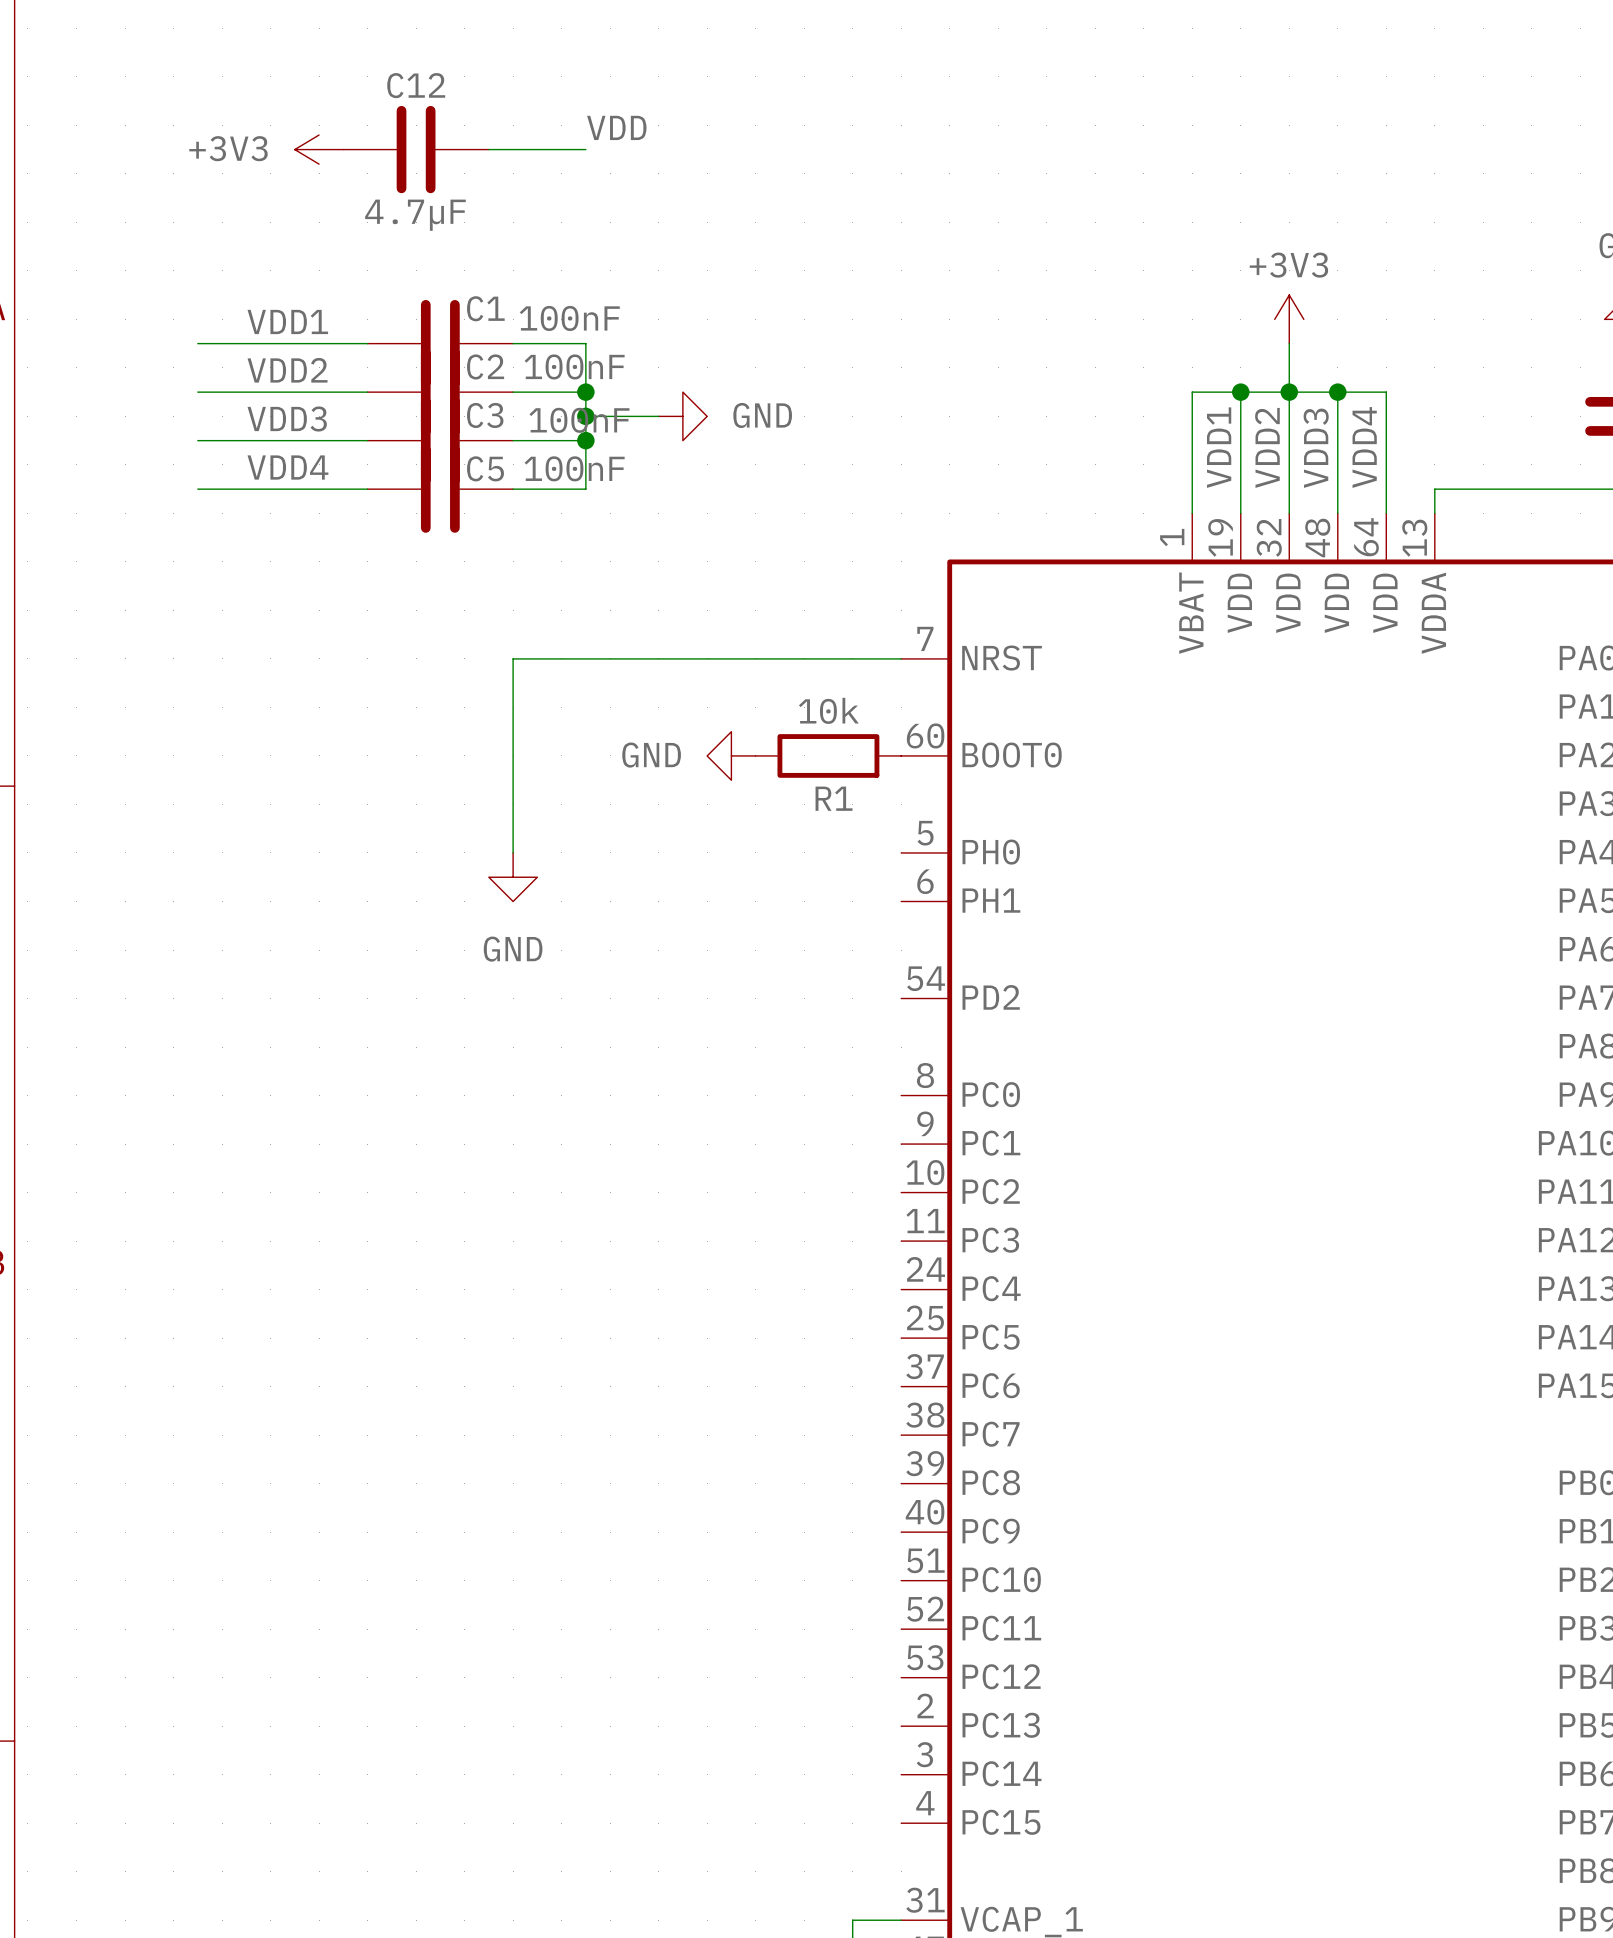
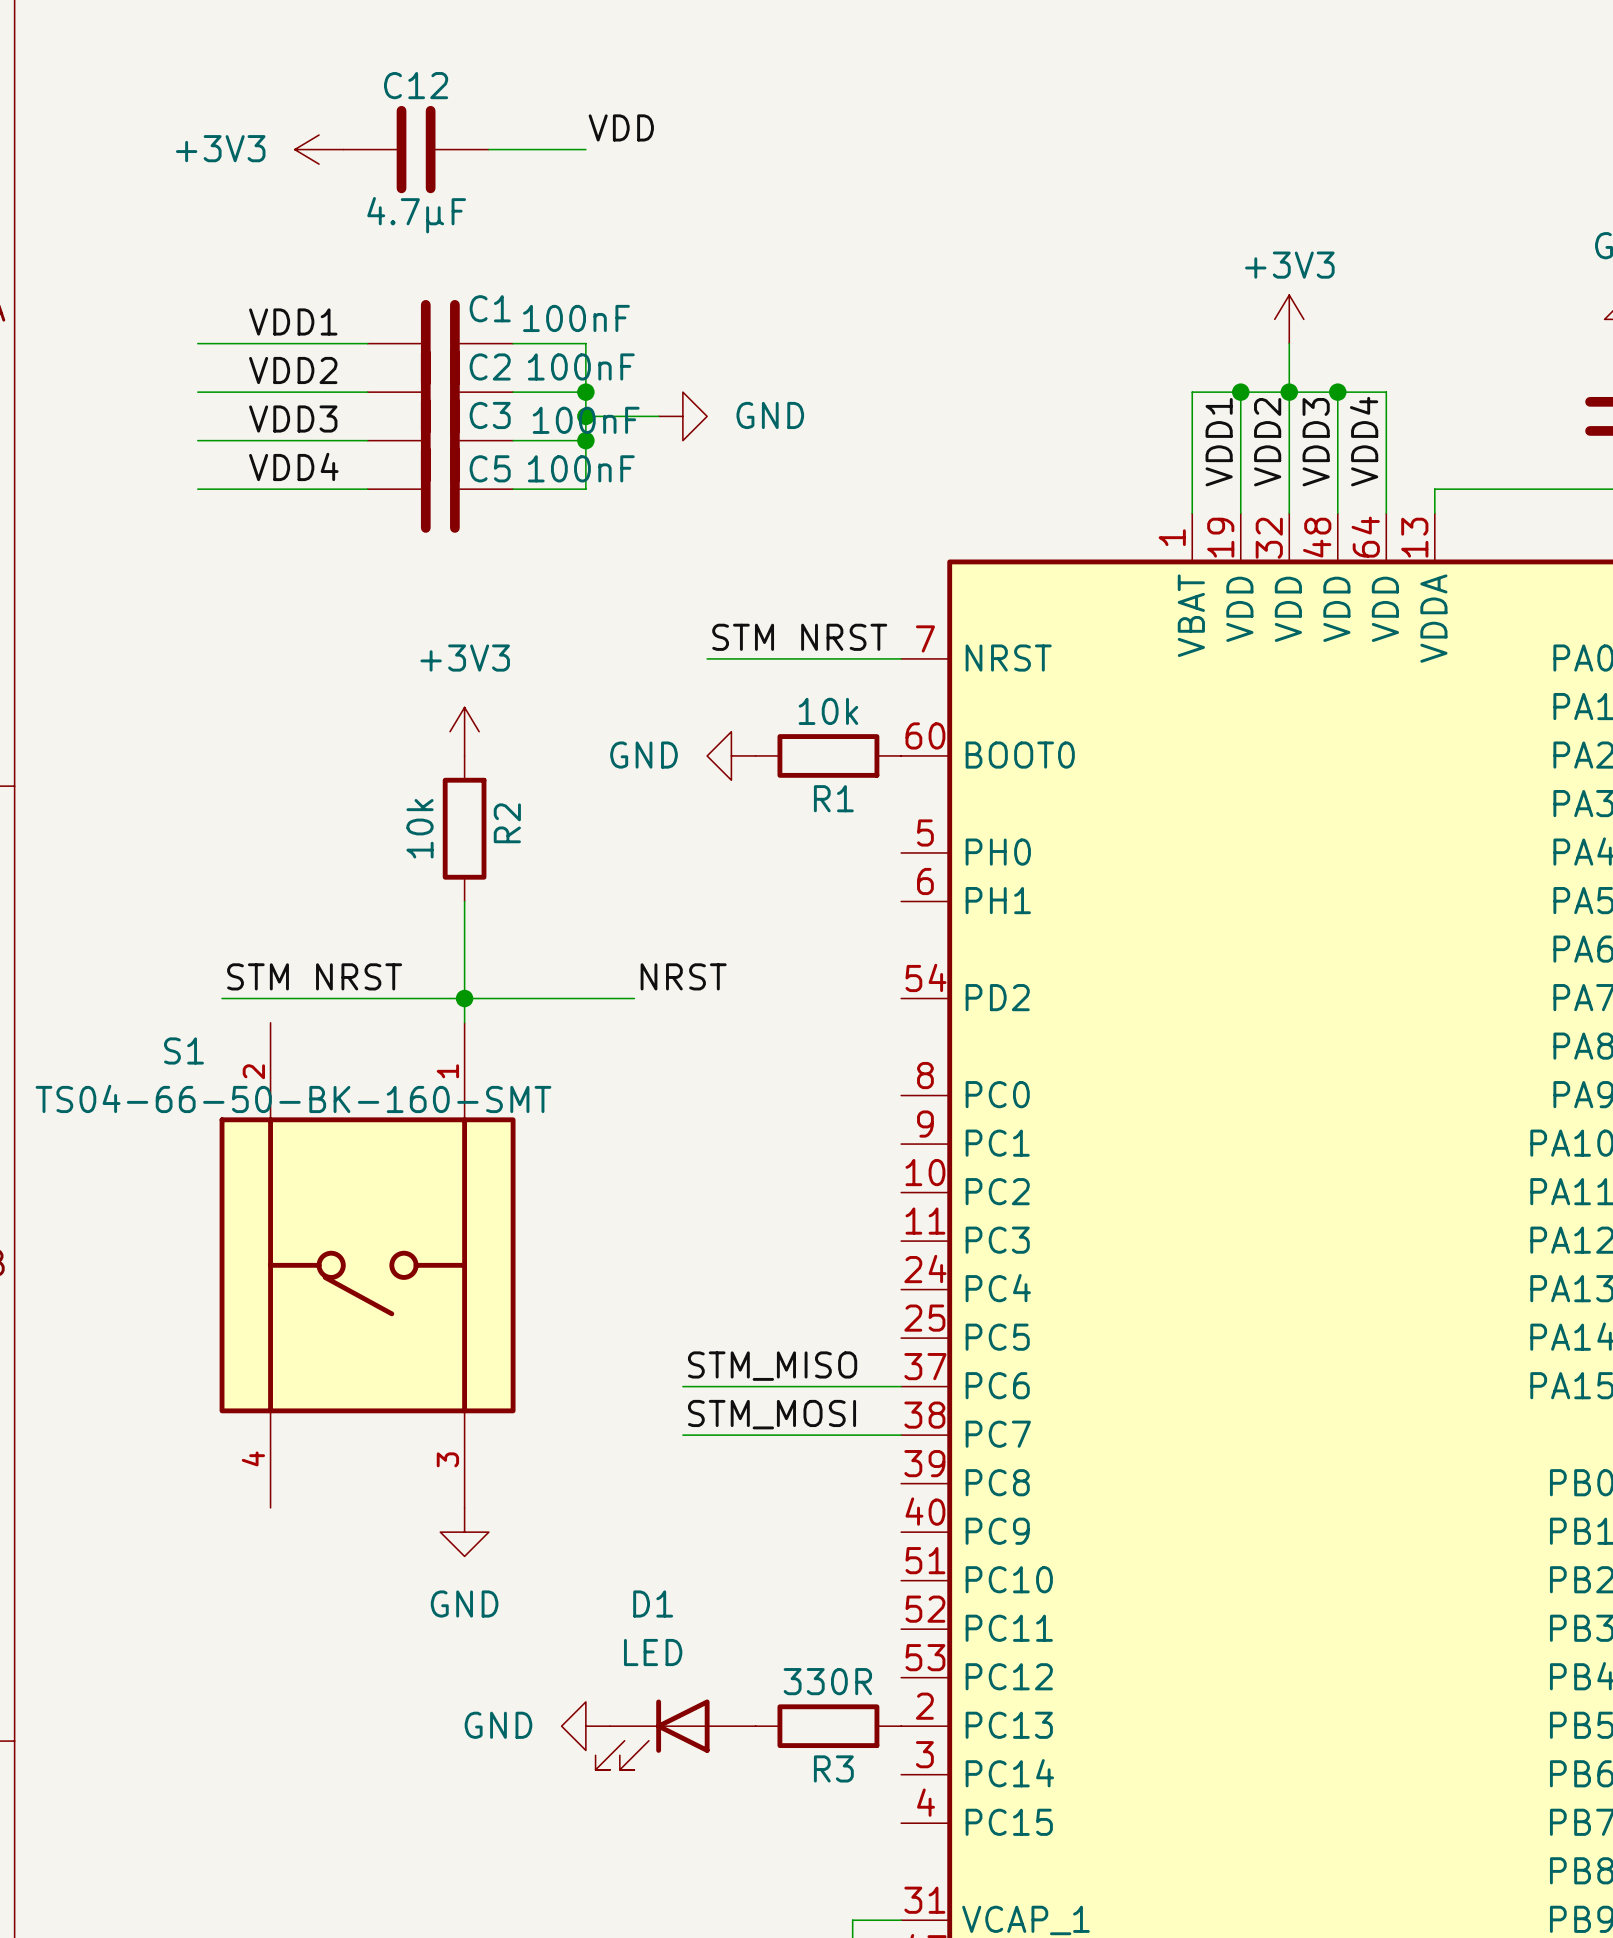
label: none -> STM NRST (799, 637)
wire: (707, 658) (513, 658) (513, 852) -> none
power symbol: none -> +3V3 (464, 731)
R2: none -> 10k (464, 828)
power symbol: GND (513, 877) -> none
wire: none -> (464, 901) (464, 1022)
label: none -> STM NRST (314, 976)
label: none -> NRST (683, 976)
wire: none -> (222, 998) (634, 998)
junction: none -> (464, 998)
S1: none -> TS04-66-50-BK-160-SMT (367, 1265)
label: none -> STM_MISO (772, 1366)
wire: none -> (682, 1386) (901, 1386)
label: none -> STM_MOSI (772, 1414)
wire: none -> (682, 1435) (901, 1435)
power symbol: none -> GND (464, 1532)
power symbol: none -> GND (585, 1726)
R3: none -> 330R (828, 1726)
D1: none -> LED (675, 1734)

